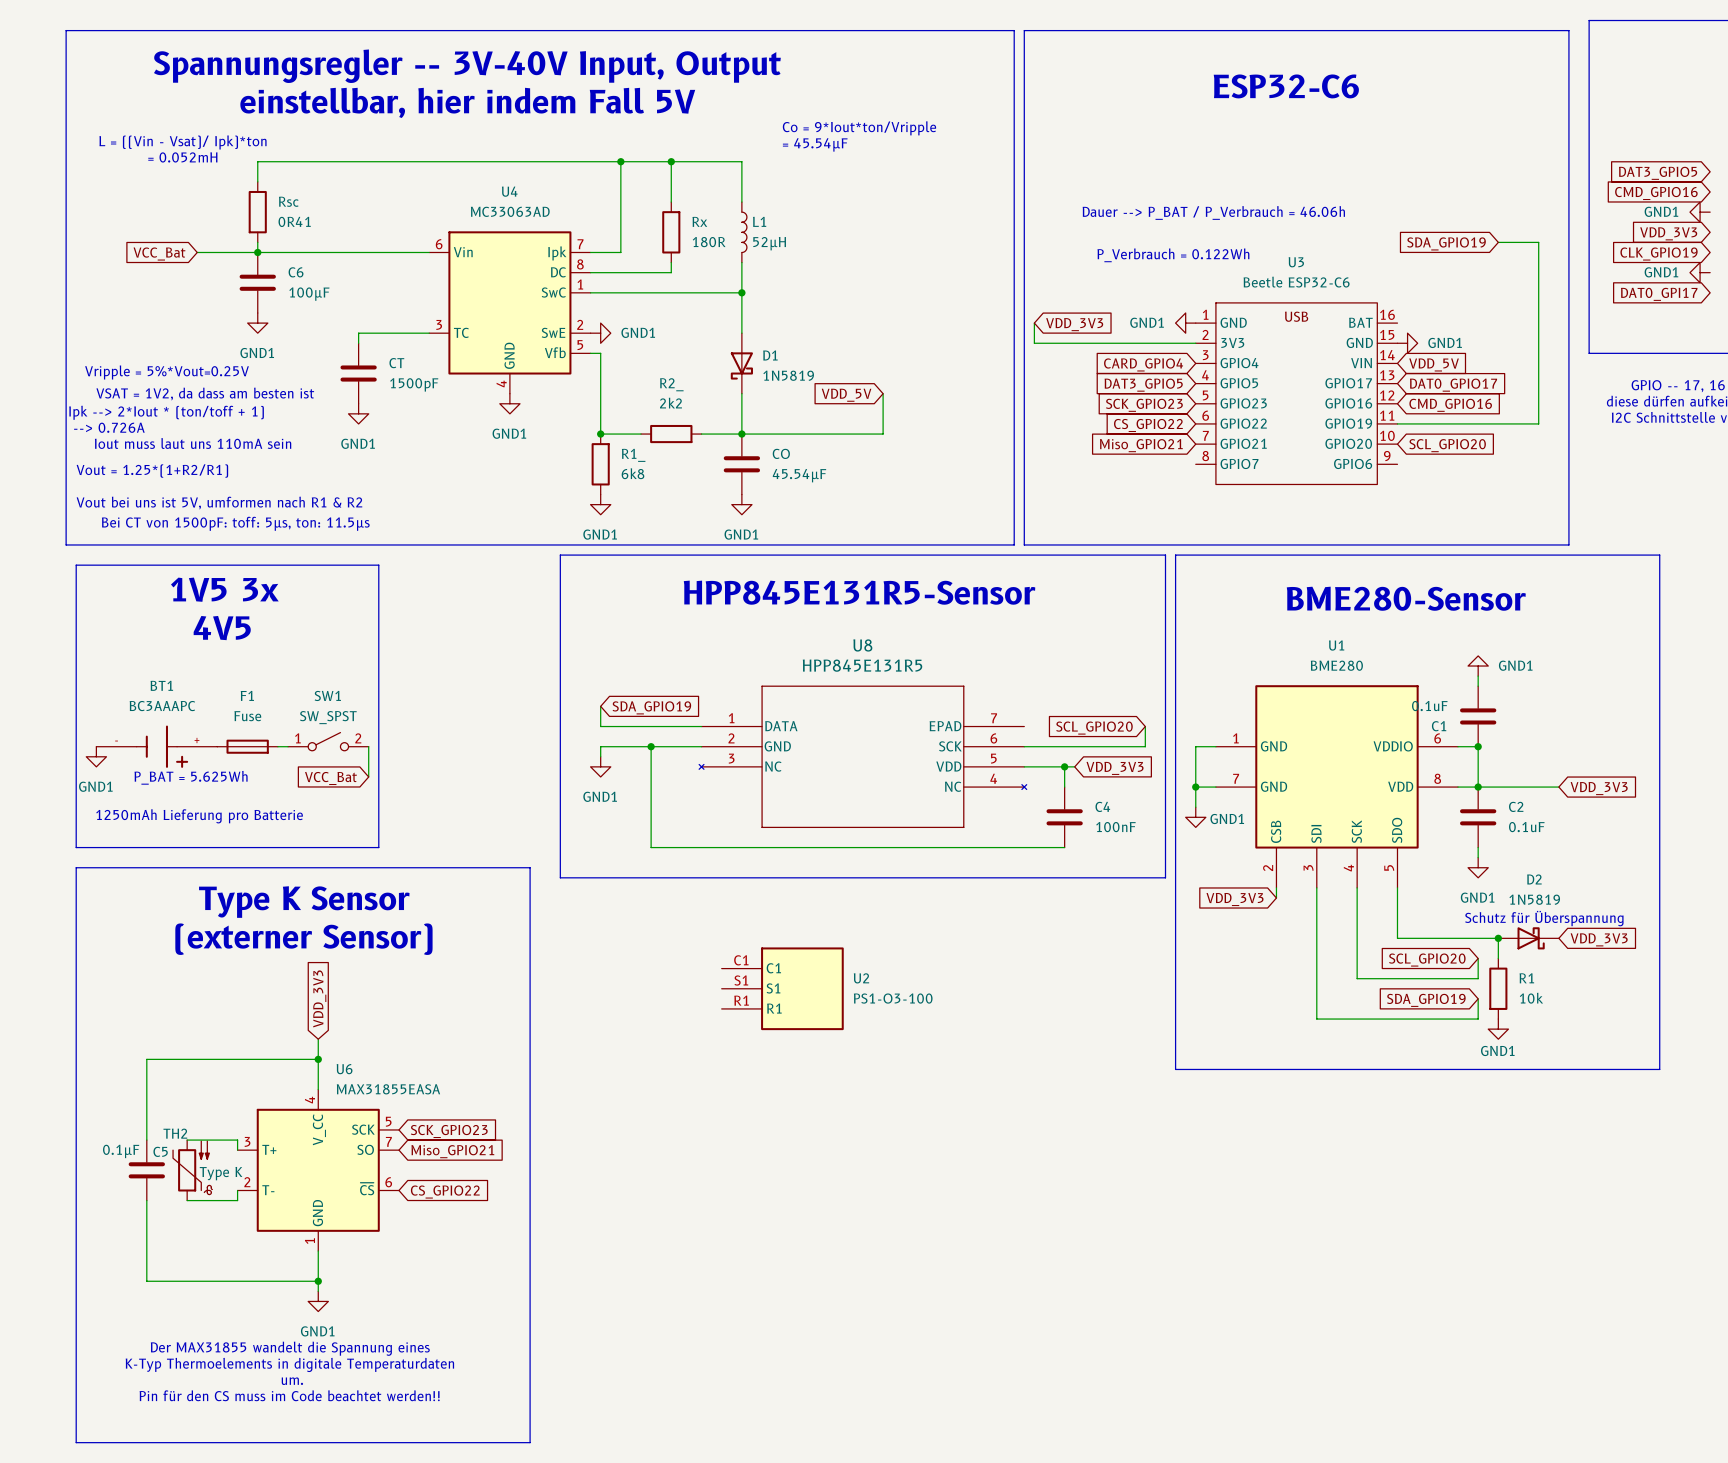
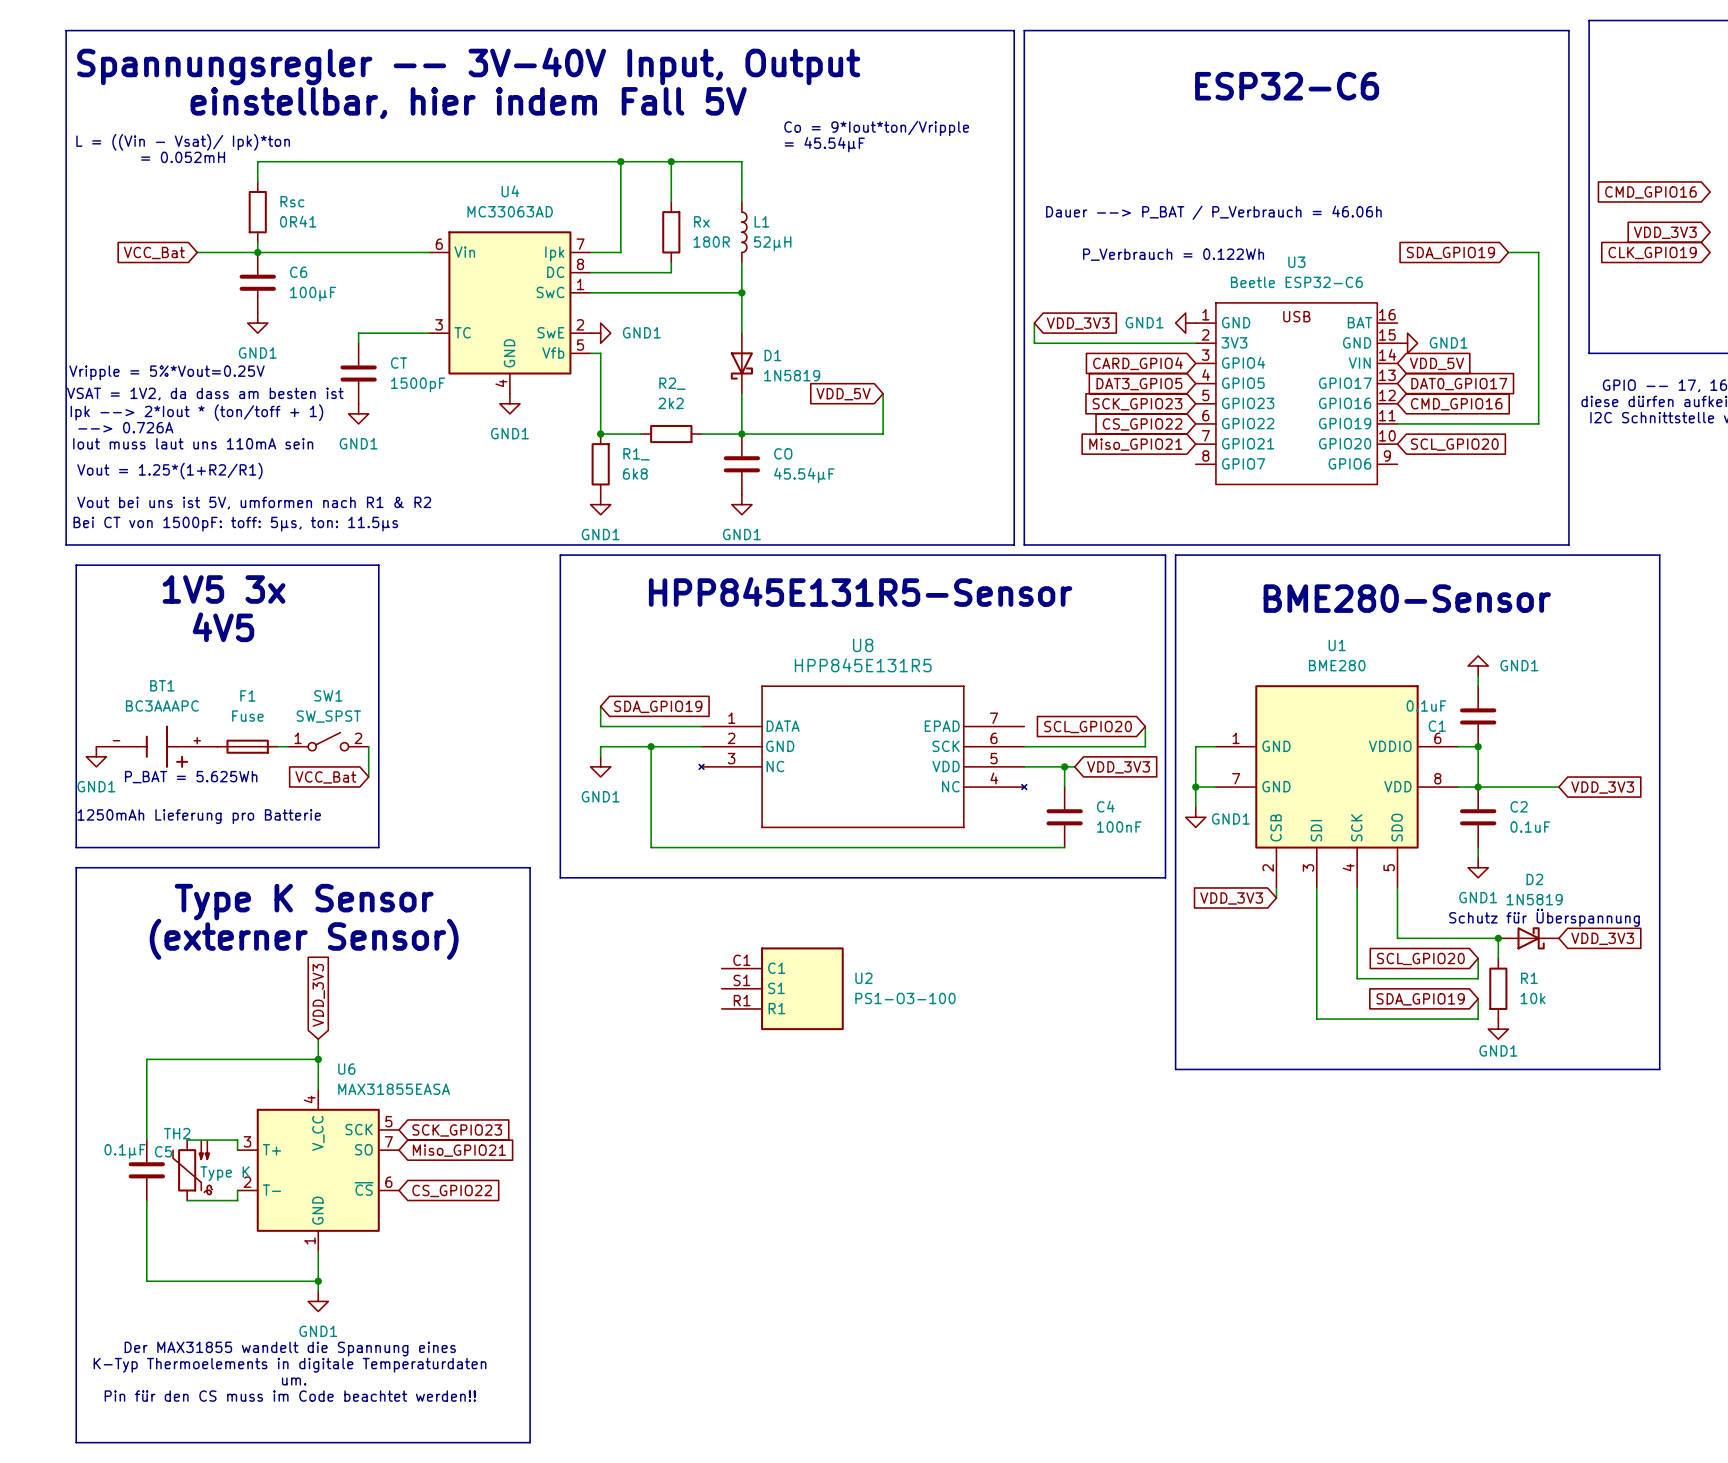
global label: DAT3_GPIO5 (1658, 173) -> none
power symbol: GND1 (1700, 212) -> none
wire: (1498, 242) (1538, 242) (1538, 252) -> (1508, 252) (1538, 252)
global label position: SDA_GPIO19 (1446, 243) -> SDA_GPIO19 (1450, 252)
power symbol: GND1 (1700, 272) -> none
global label: DAT0_GPI17 (1659, 294) -> none

